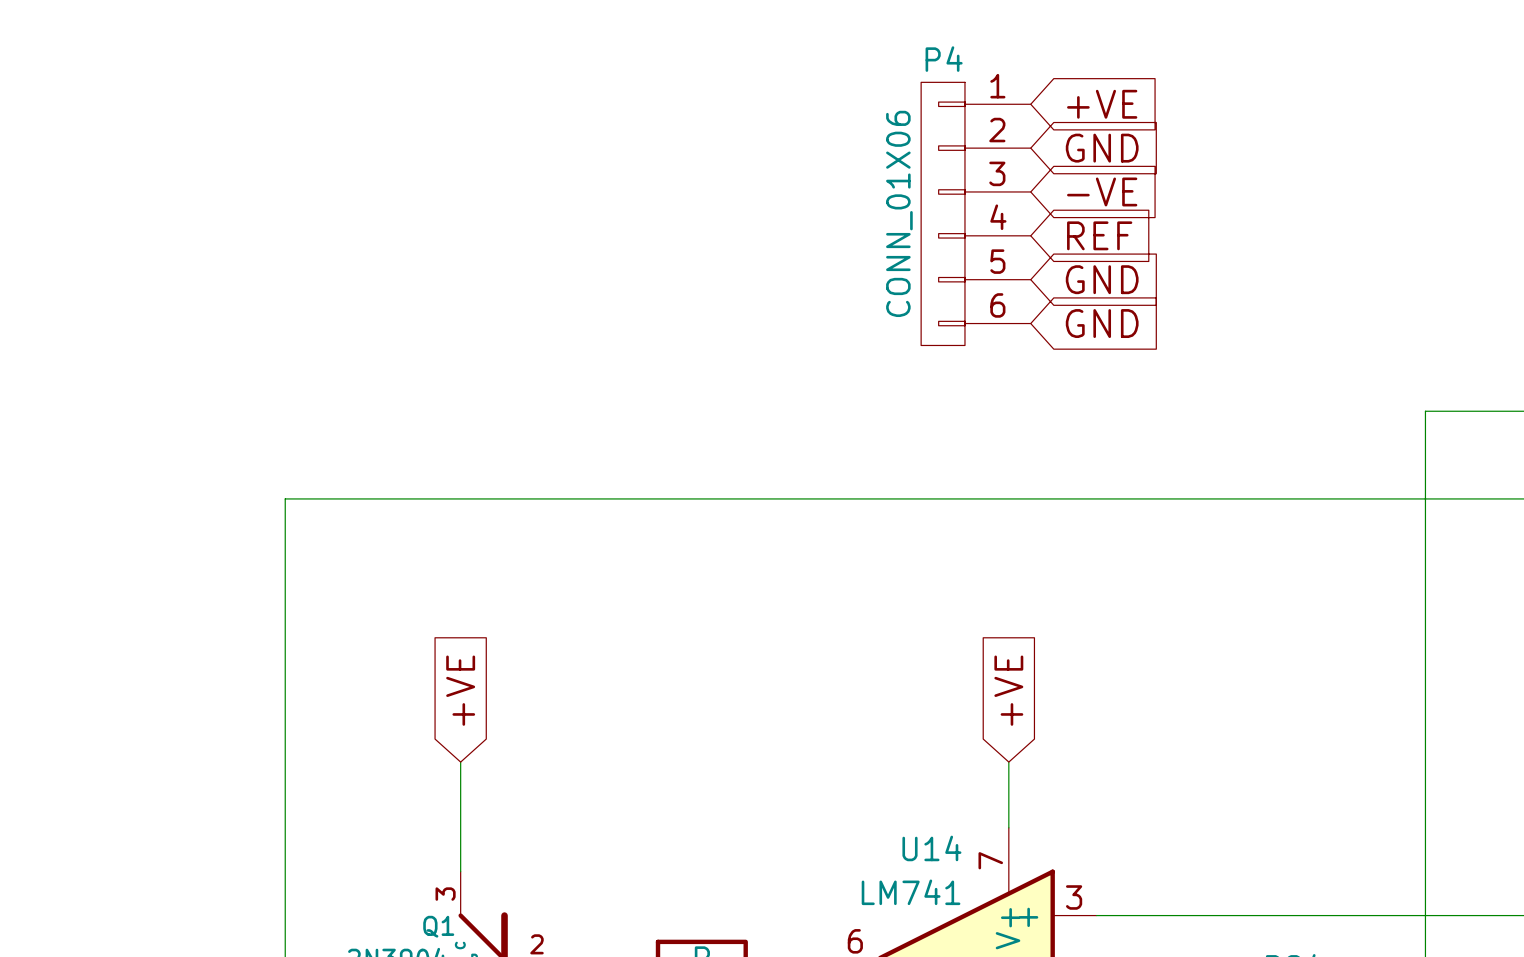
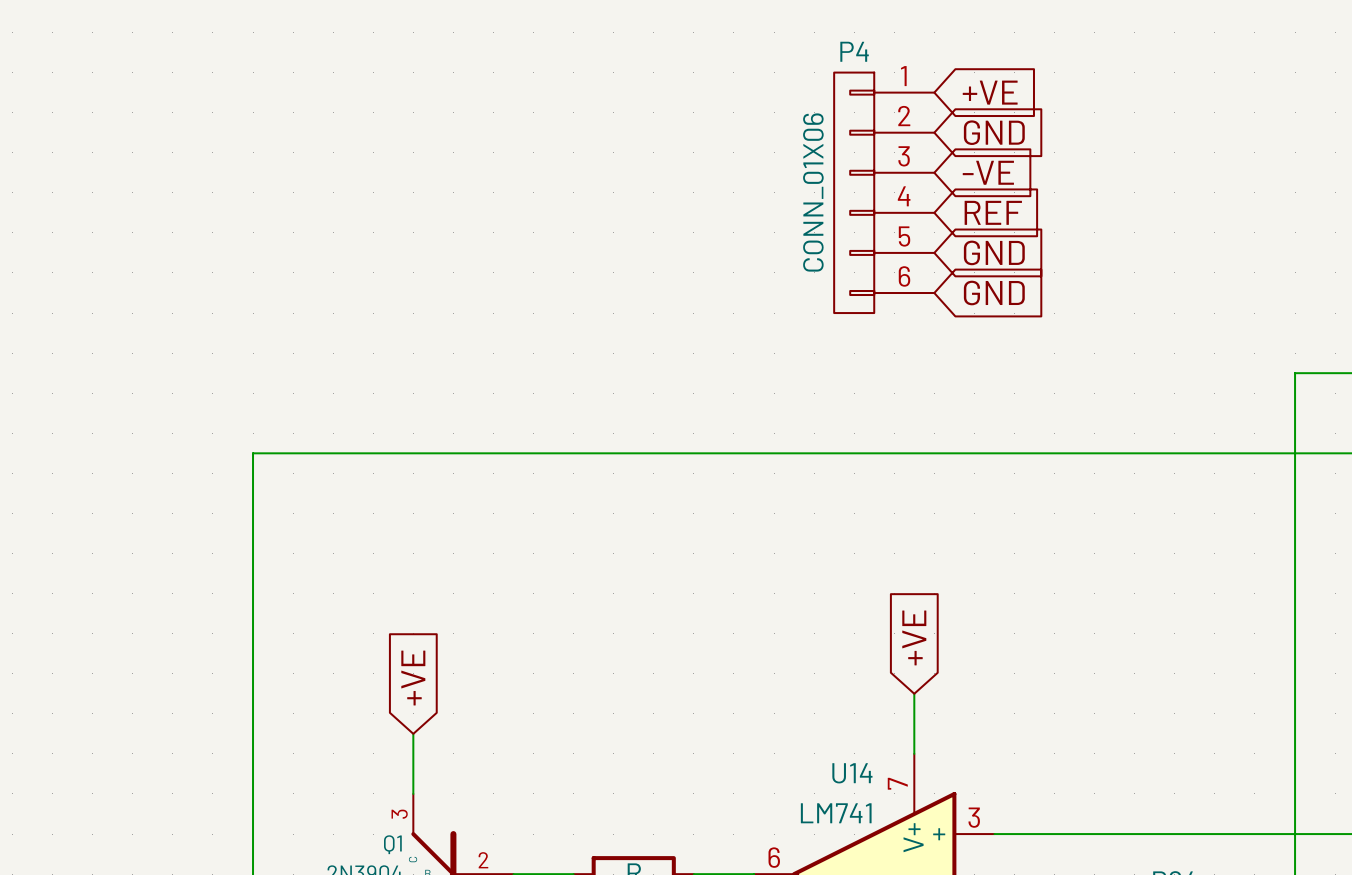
global label position: +VE (460, 690) -> +VE (413, 678)
wire: (460, 762) (460, 805) -> none

